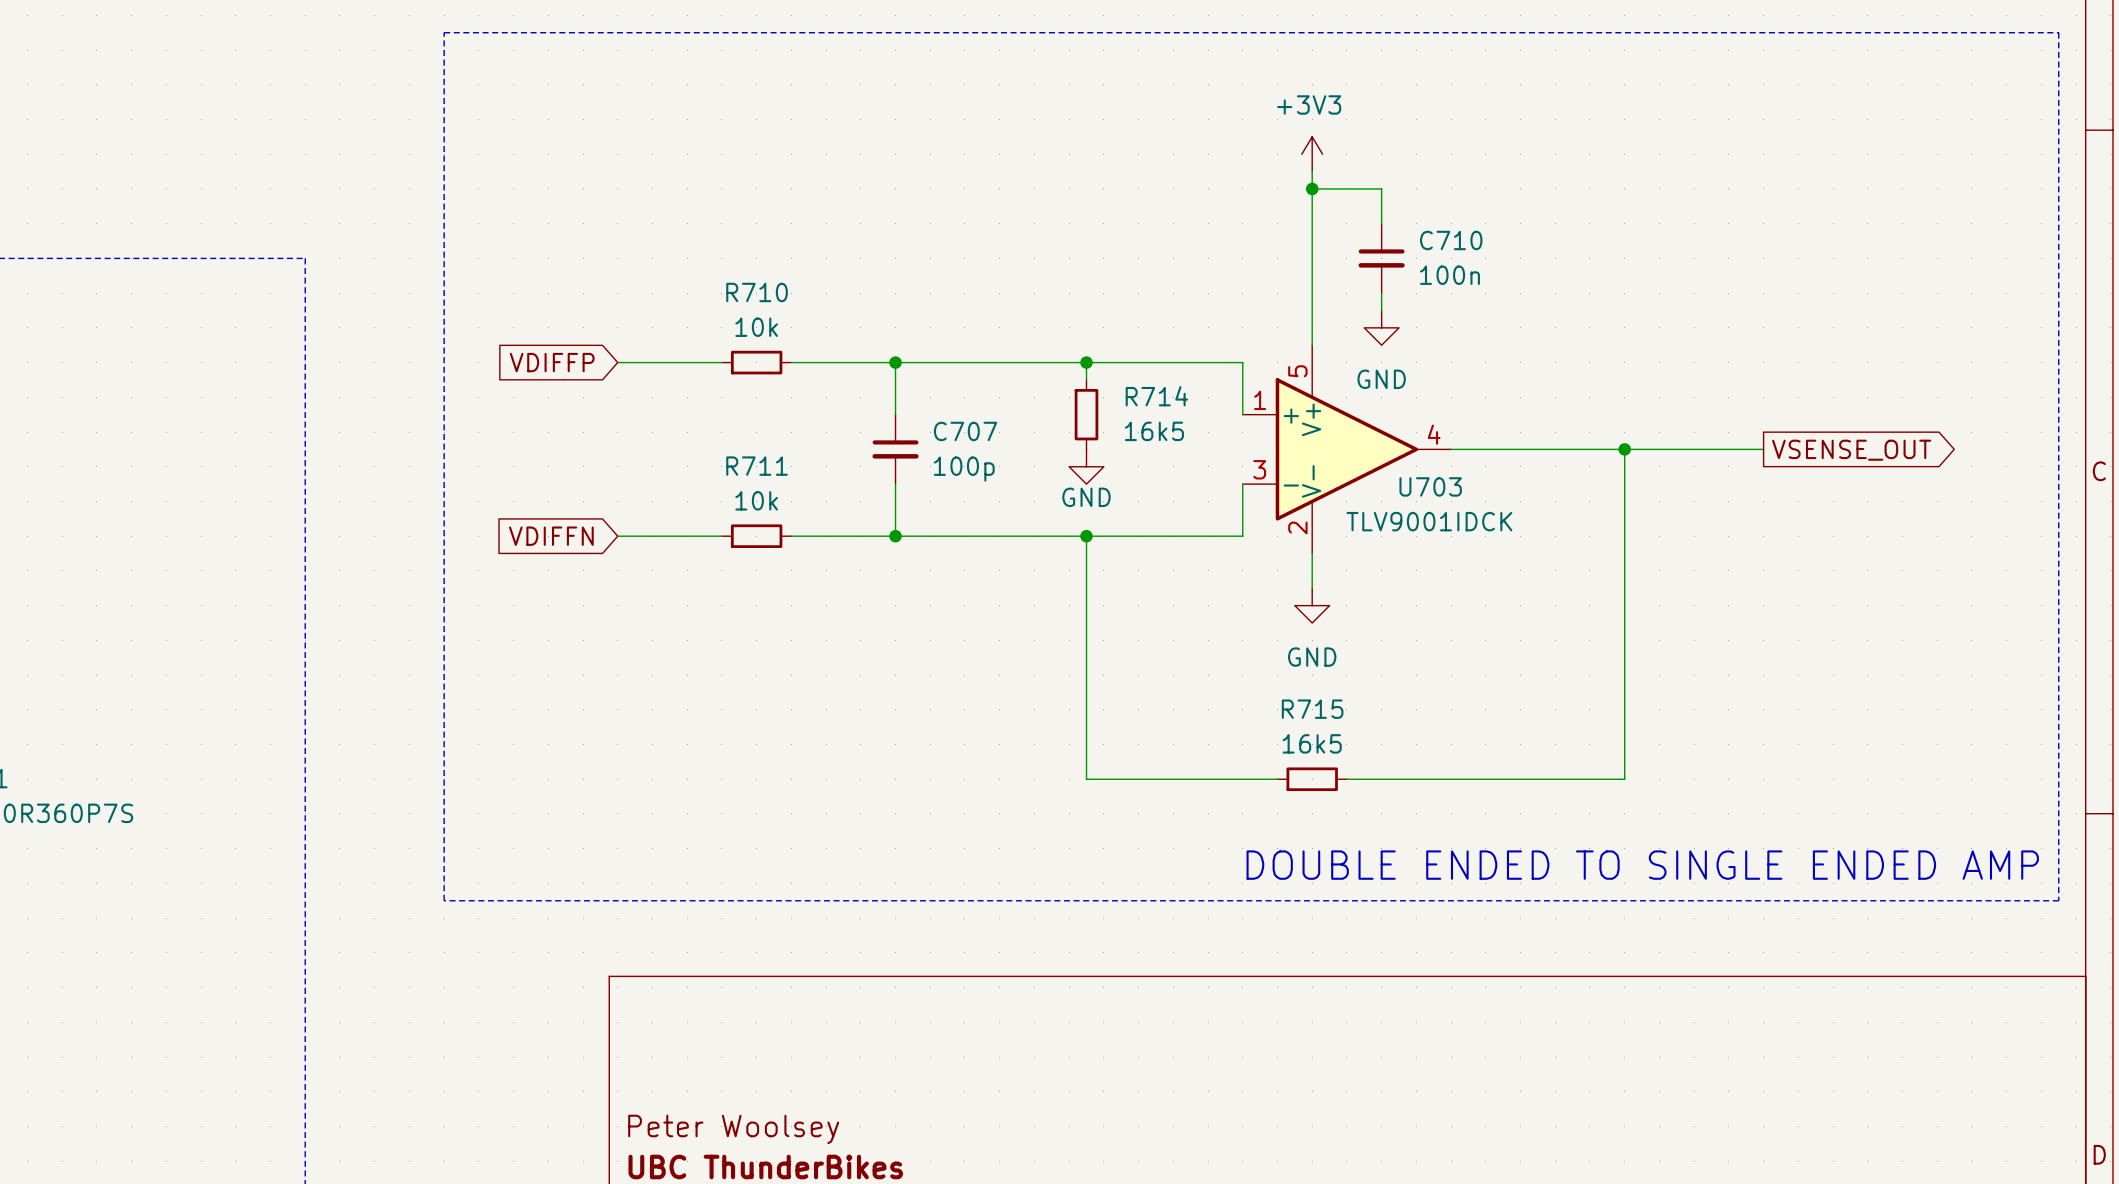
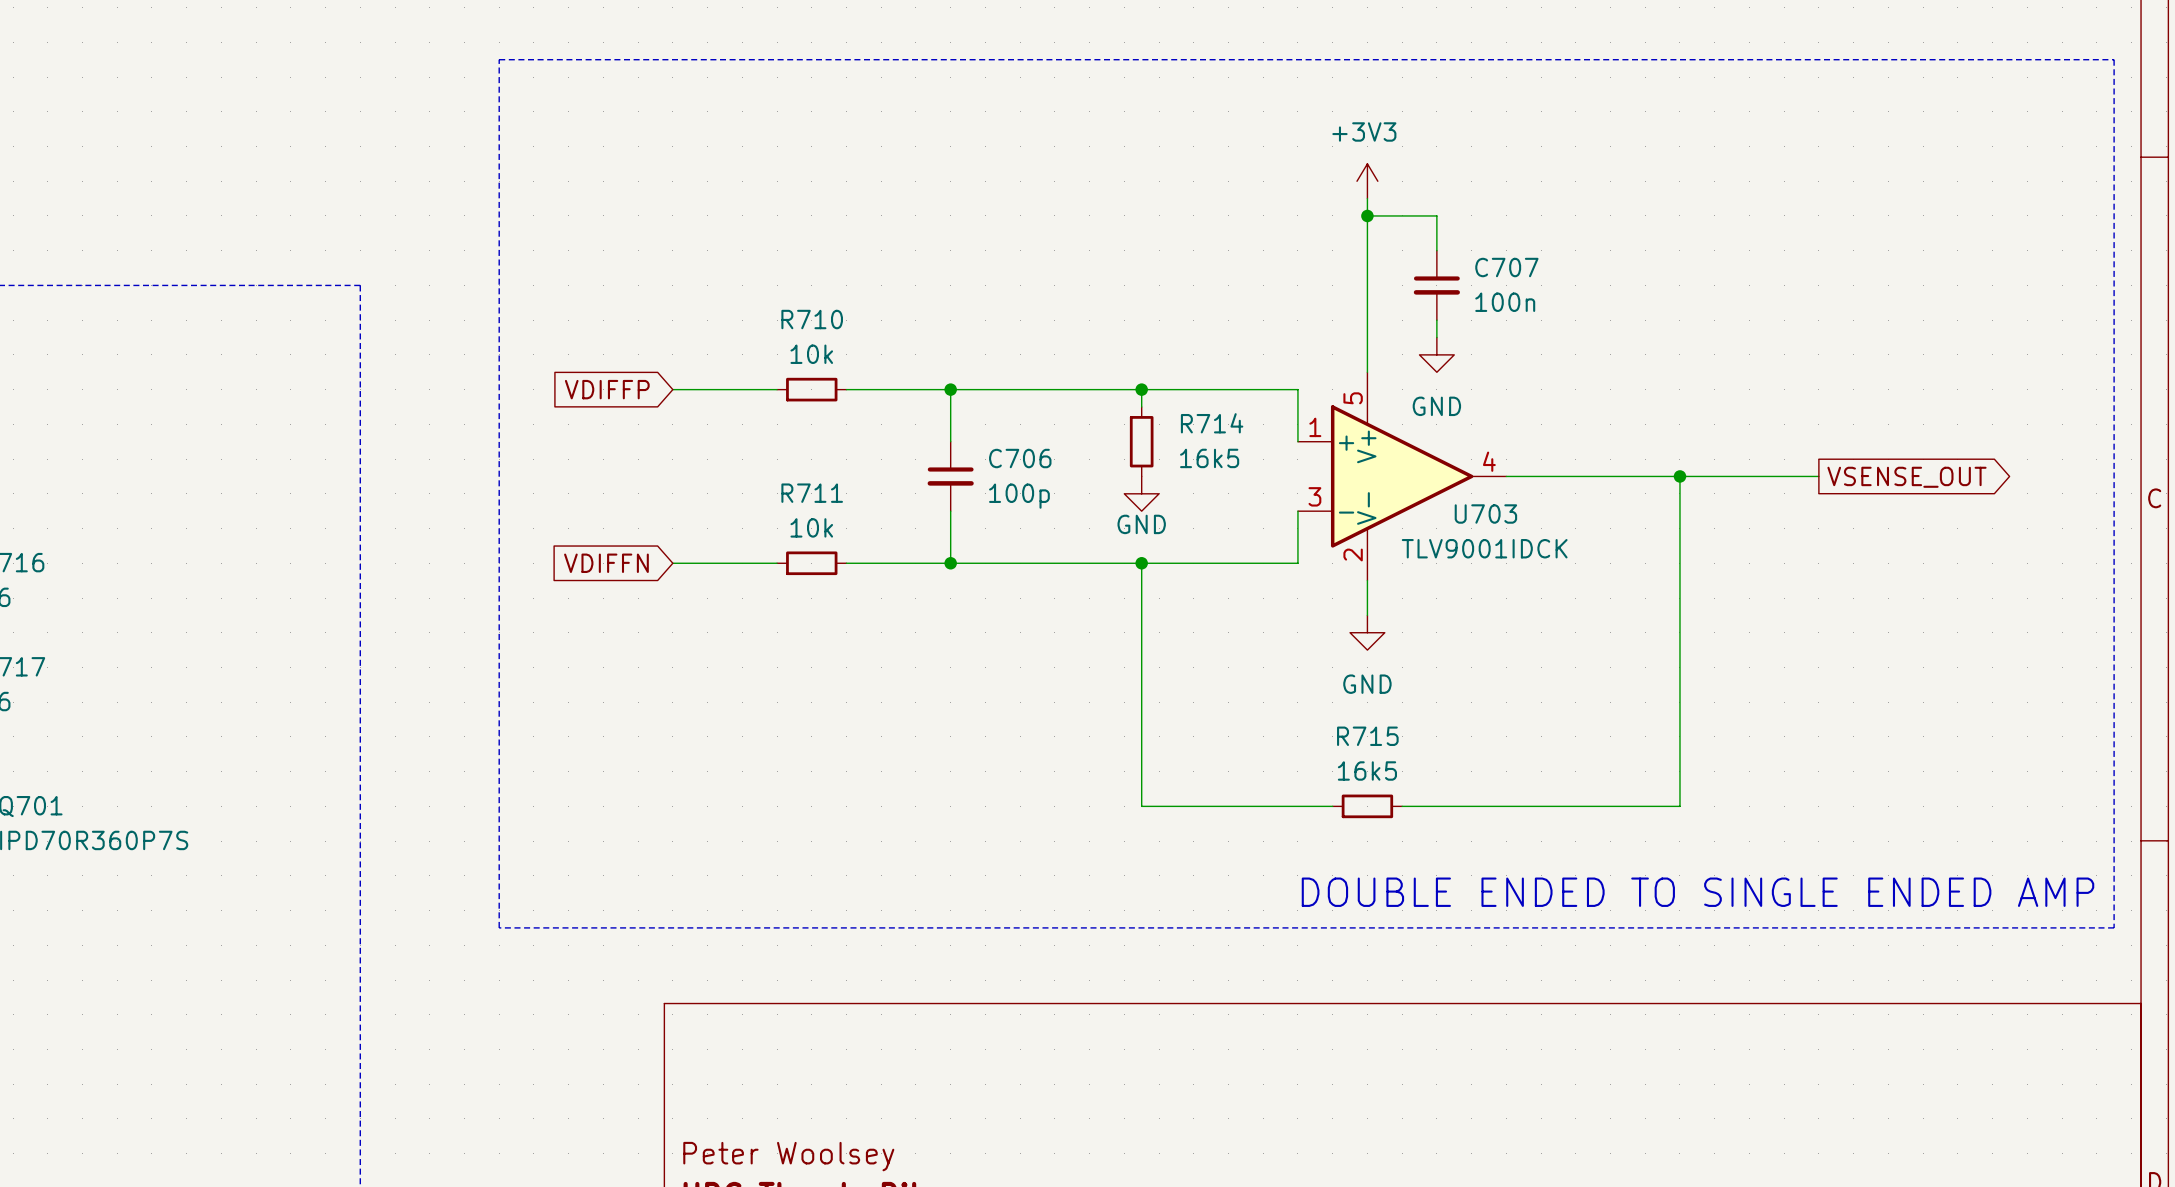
C710 name: C710 (1451, 240) -> C707 (1506, 267)
C707 name: C707 (965, 431) -> C706 (1020, 458)

